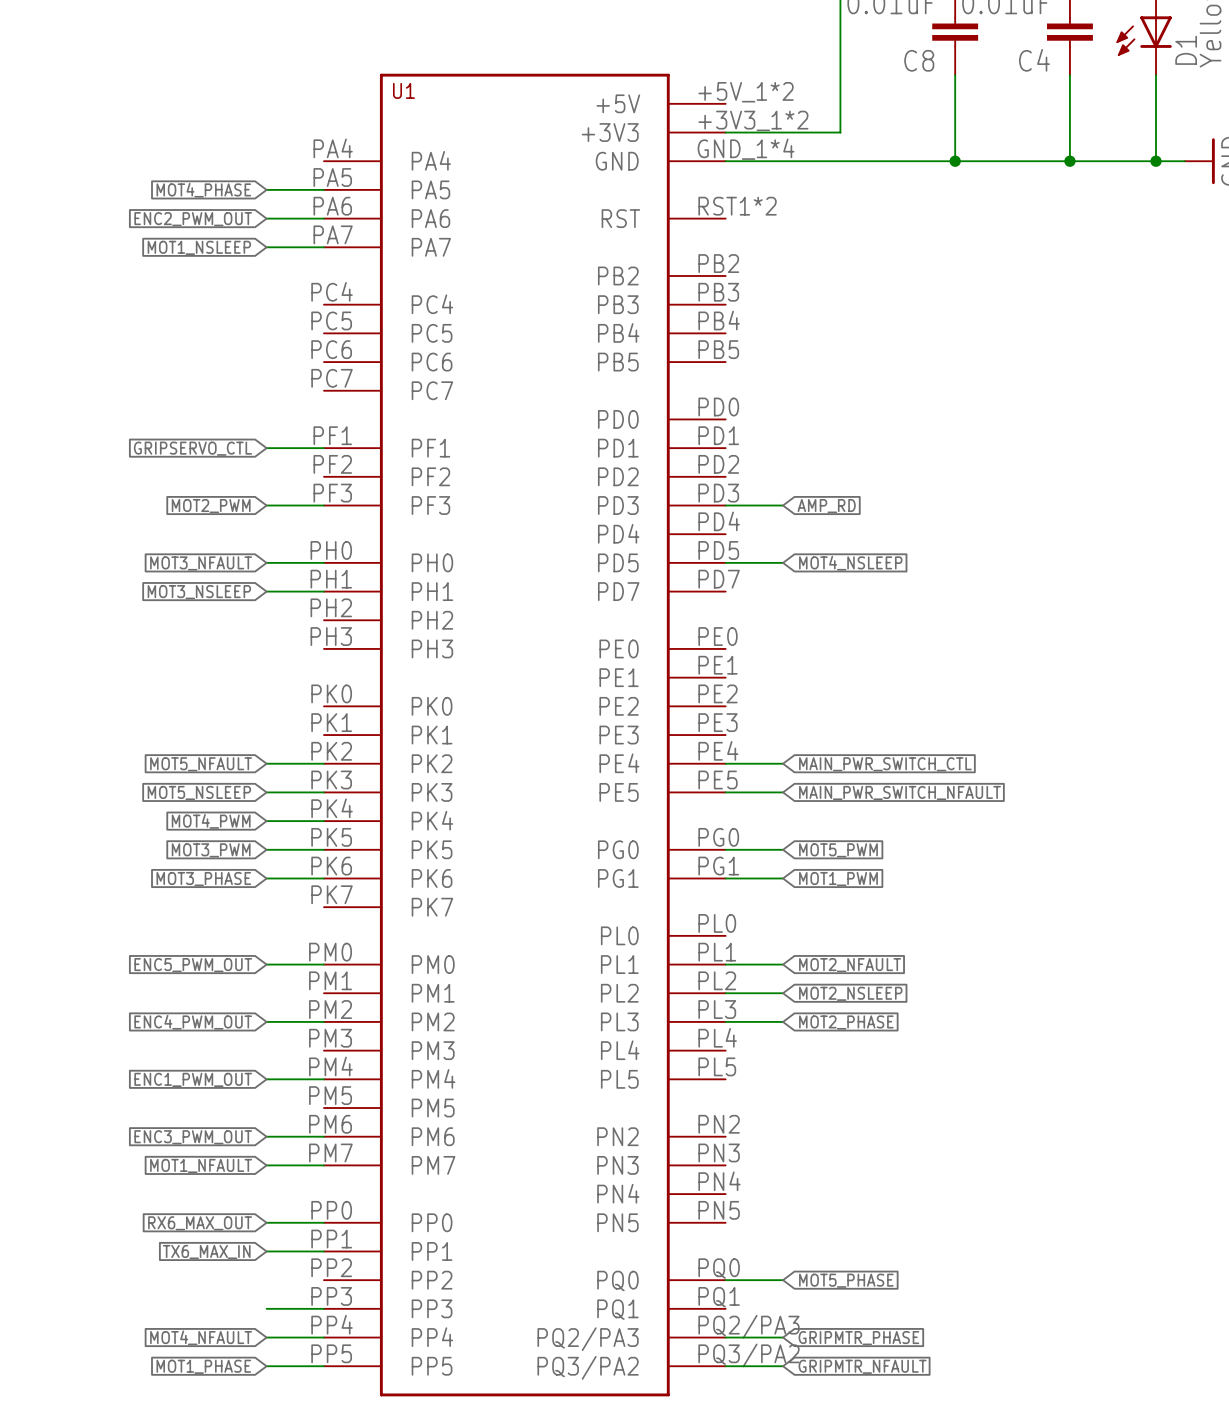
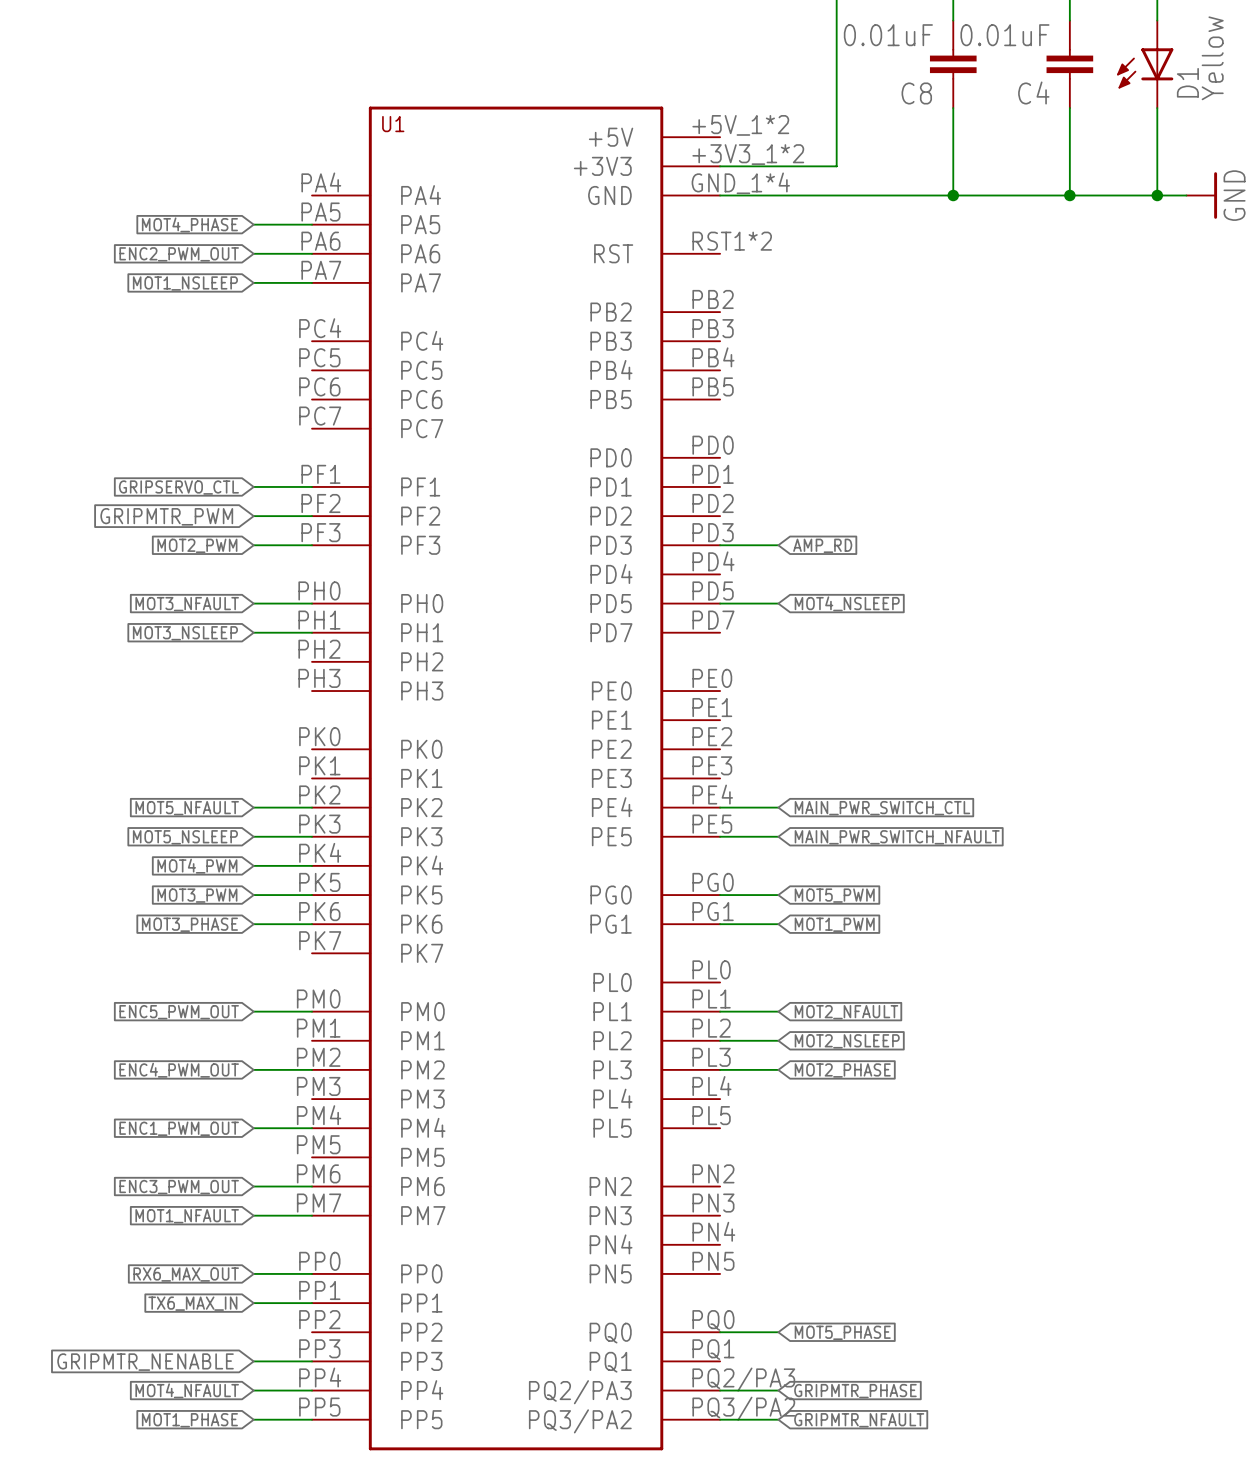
wire: none -> (253, 516) (312, 516)
global label: none -> GRIPMTR_PWM (166, 516)
global label: none -> GRIPMTR_NENABLE (145, 1362)

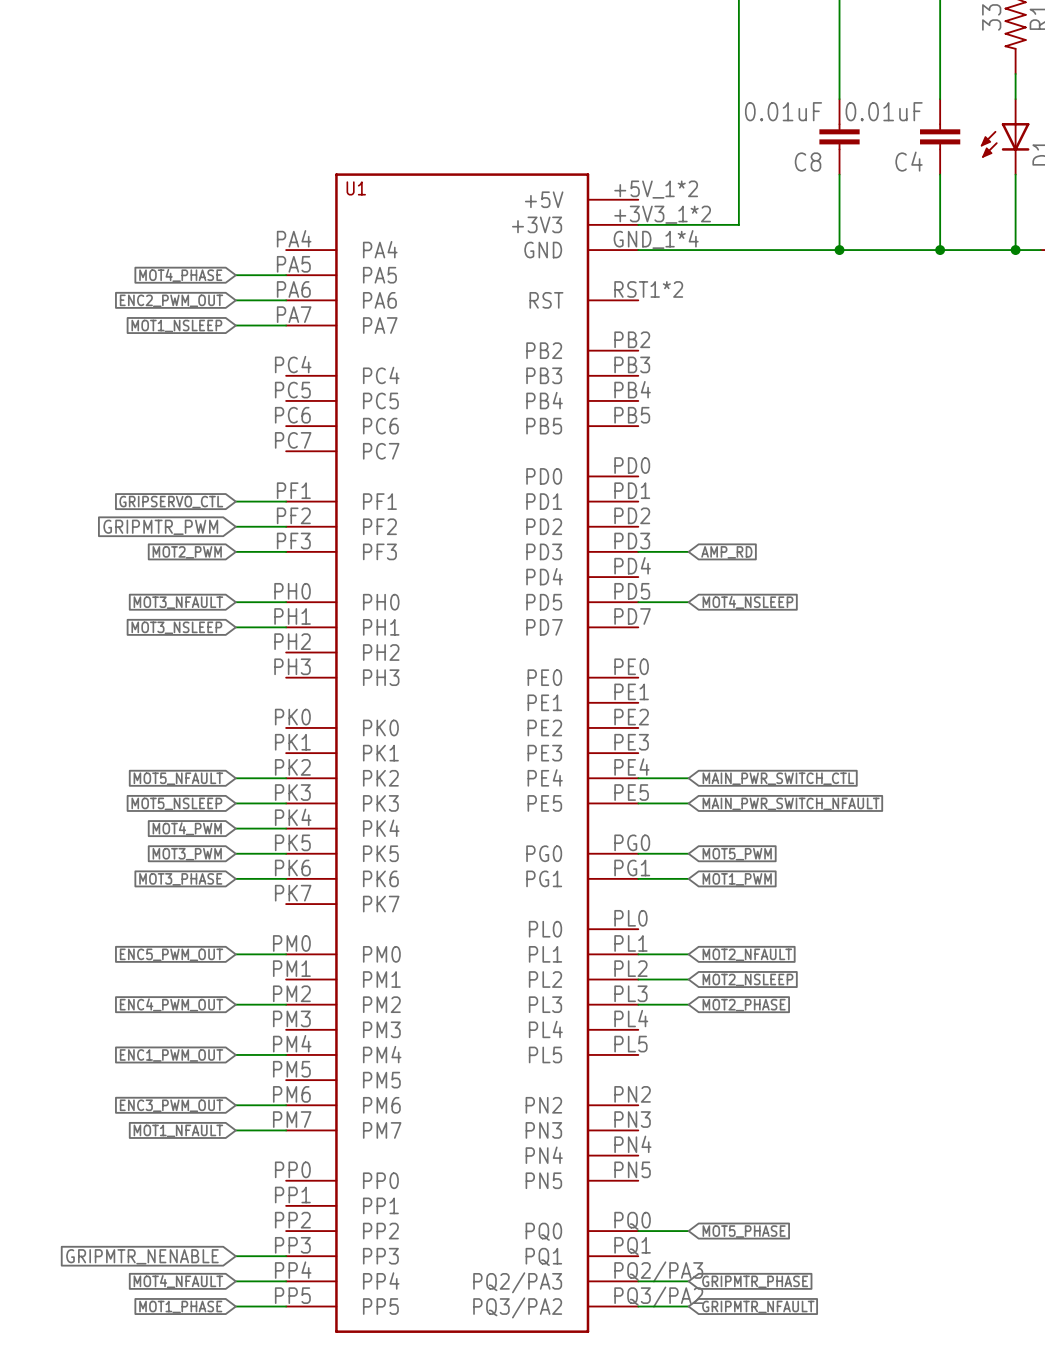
wire: (253, 1273) (312, 1273) -> none
global label: RX6_MAX_OUT (186, 1274) -> none
global label: TX6_MAX_IN (192, 1303) -> none
wire: (253, 1303) (312, 1303) -> none

